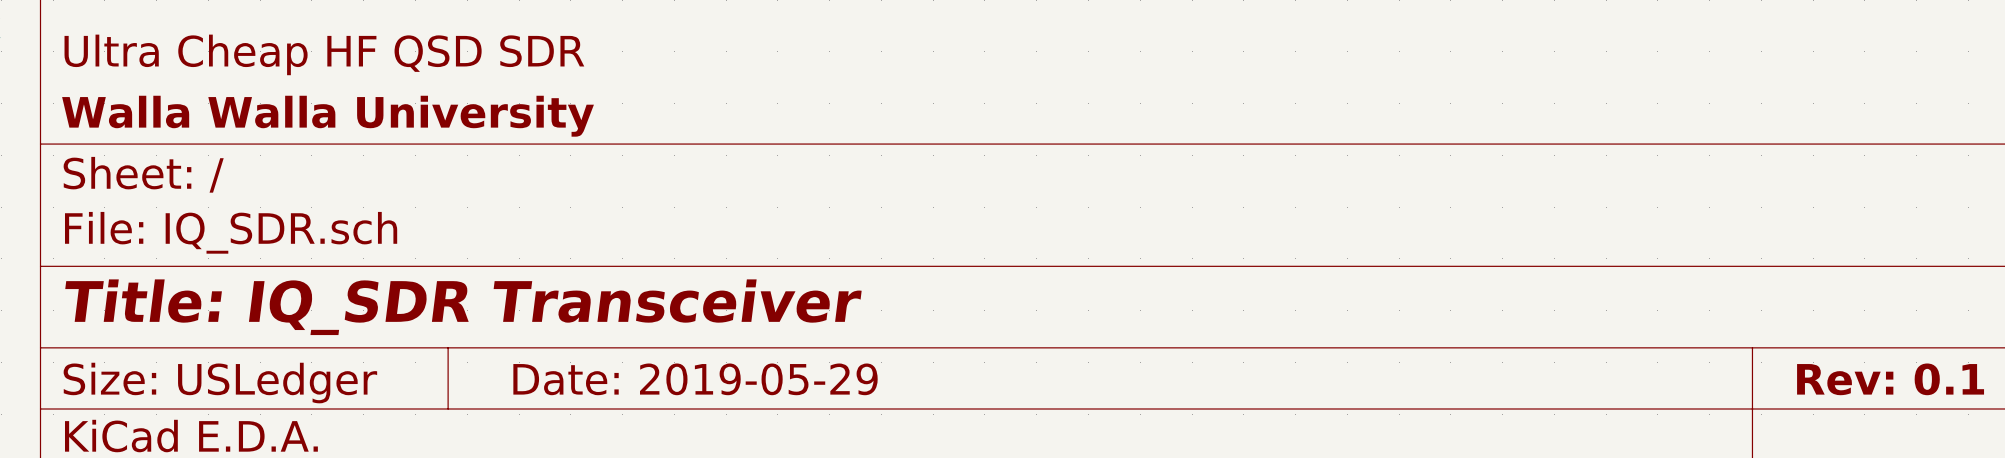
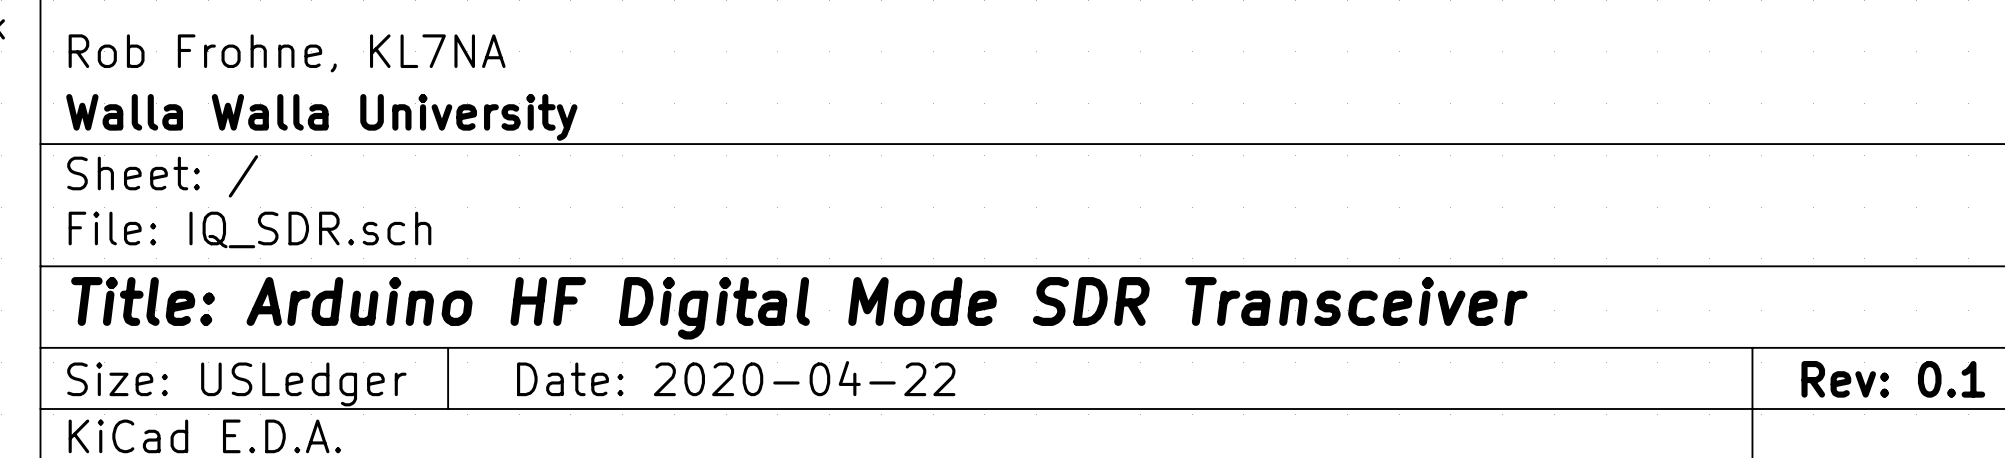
title block: Ultra Cheap HF QSD SDR (324, 54) -> Rob Frohne, KL7NA (287, 53)
title block: Title: IQ_SDR Transceiver (463, 307) -> Title: Arduino HF Digital Mode SDR Transceiver (799, 308)
title block: Date: 2019-05-29 (695, 379) -> Date: 2020-04-22 (736, 378)

